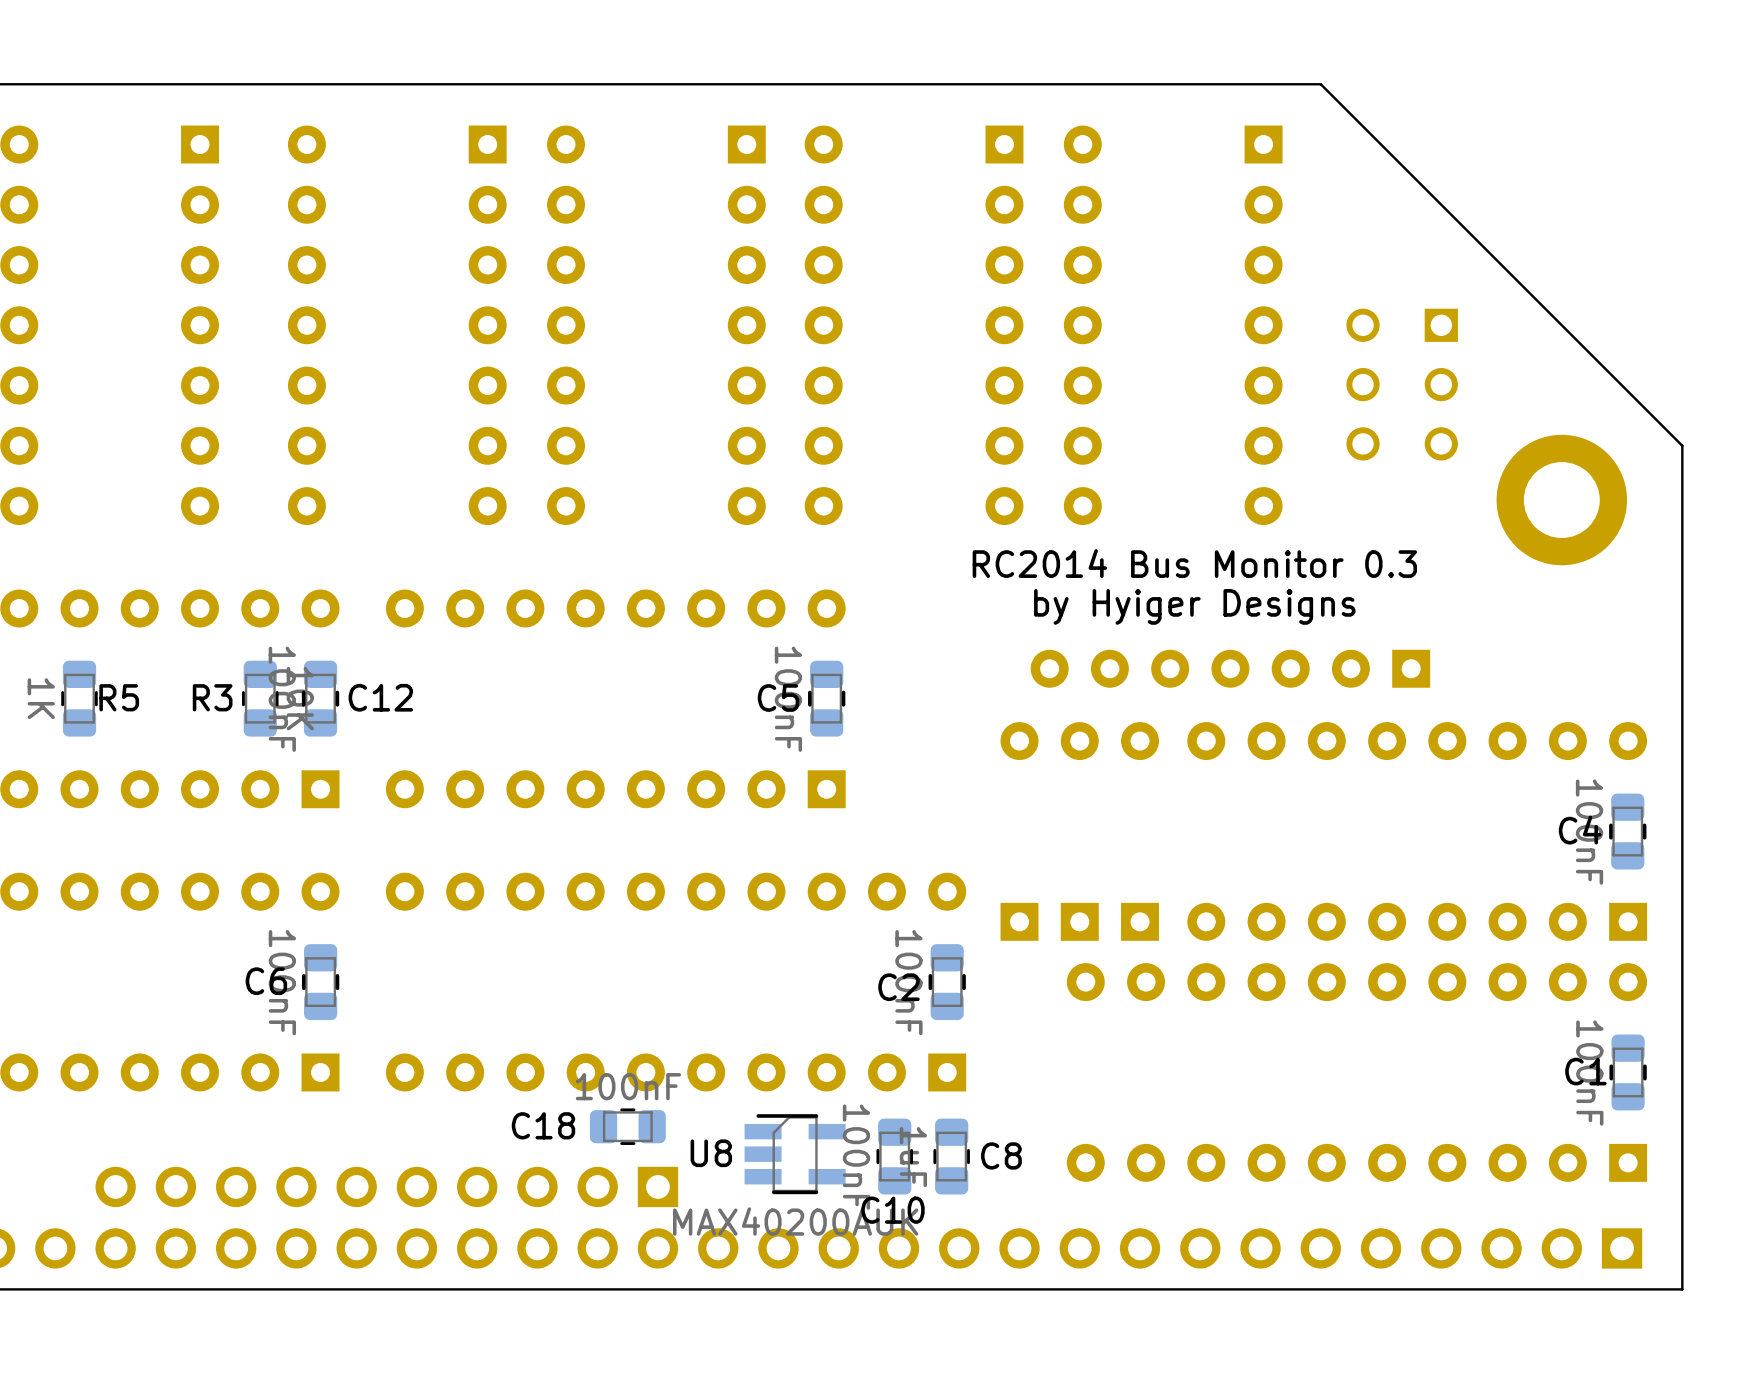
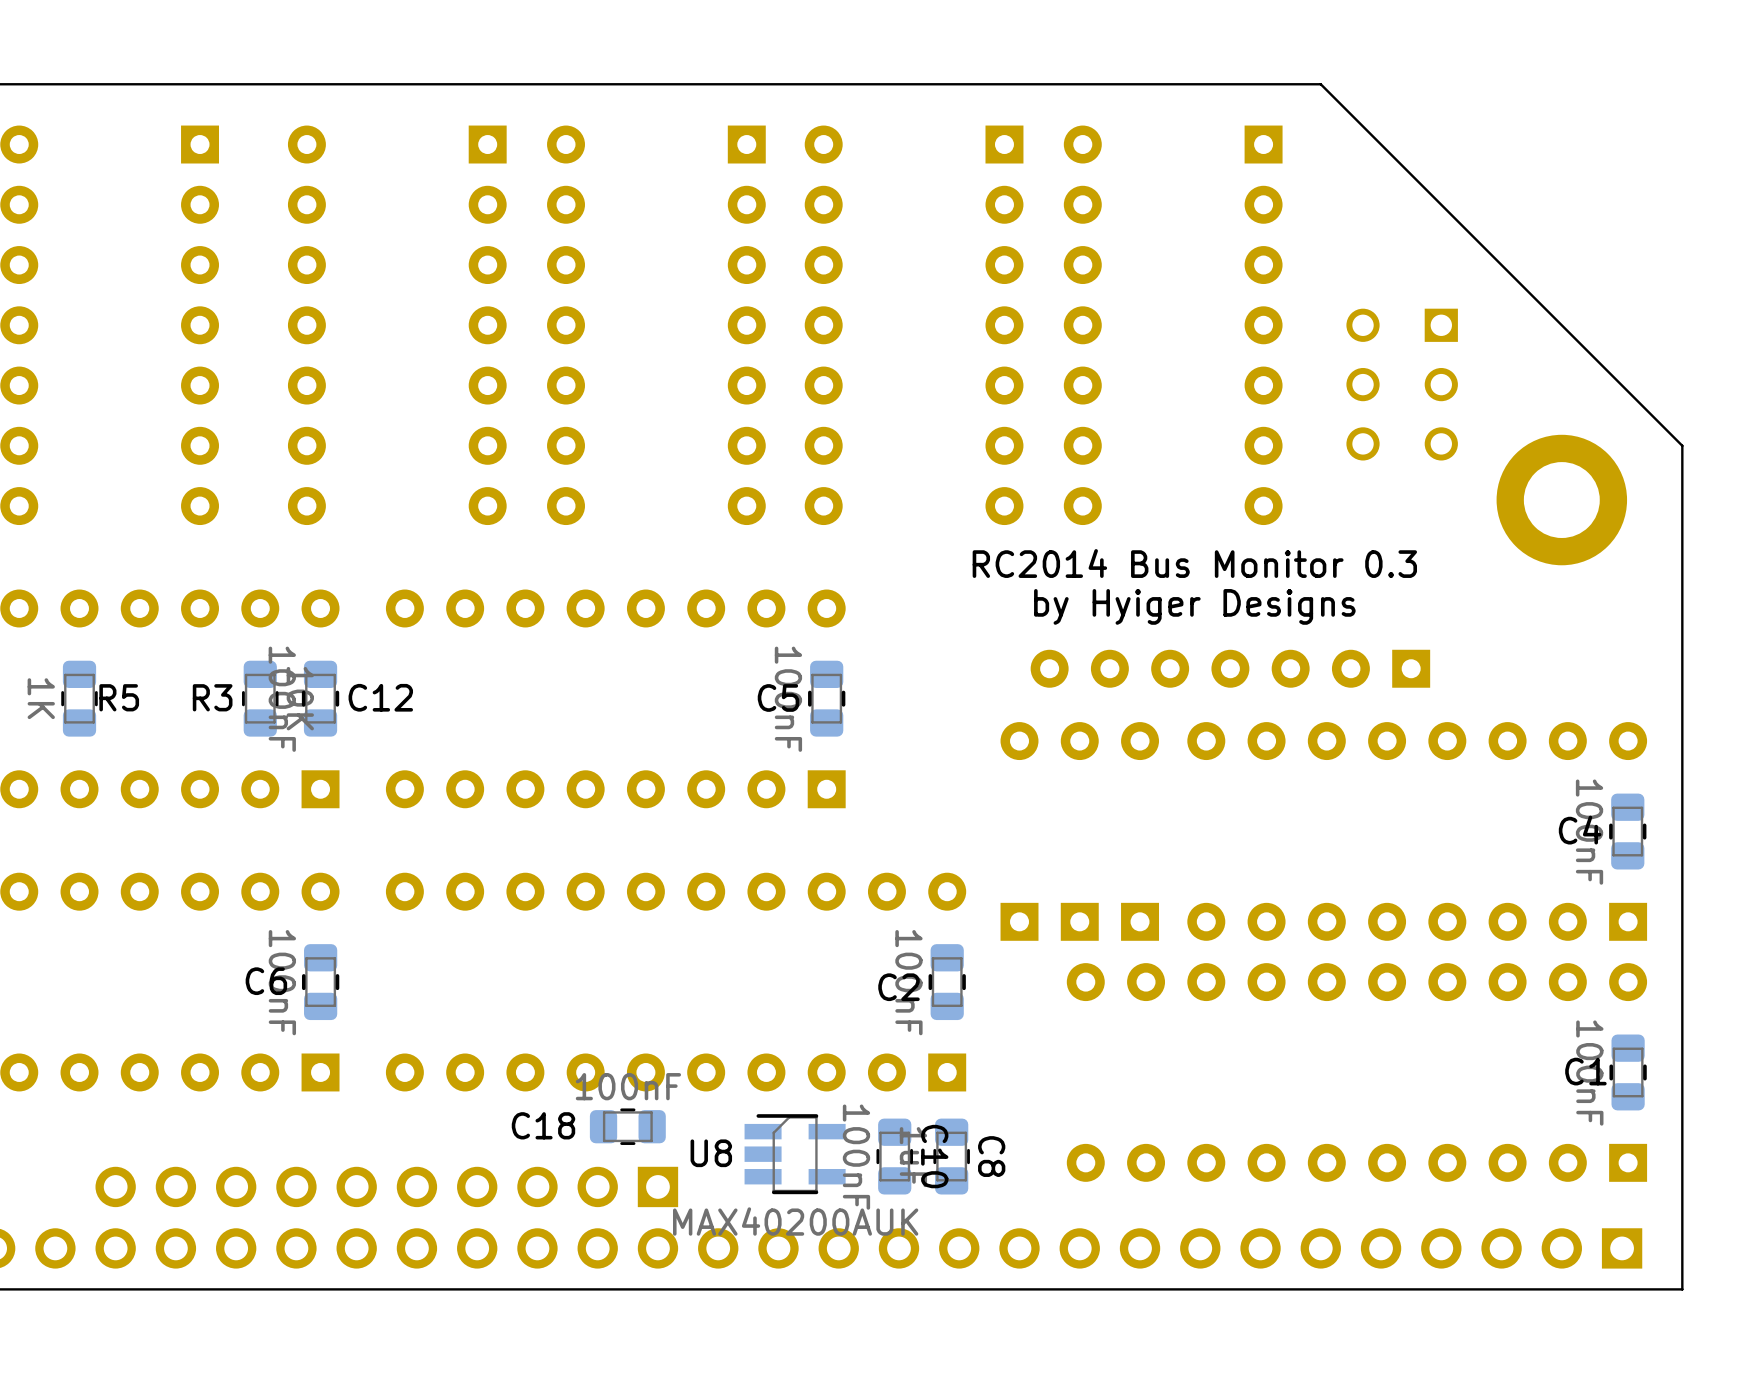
C8 name rotation: 0° (1001, 1155) -> 90° clockwise (991, 1156)
C10 name rotation: 0° (892, 1210) -> 90° clockwise (934, 1156)

